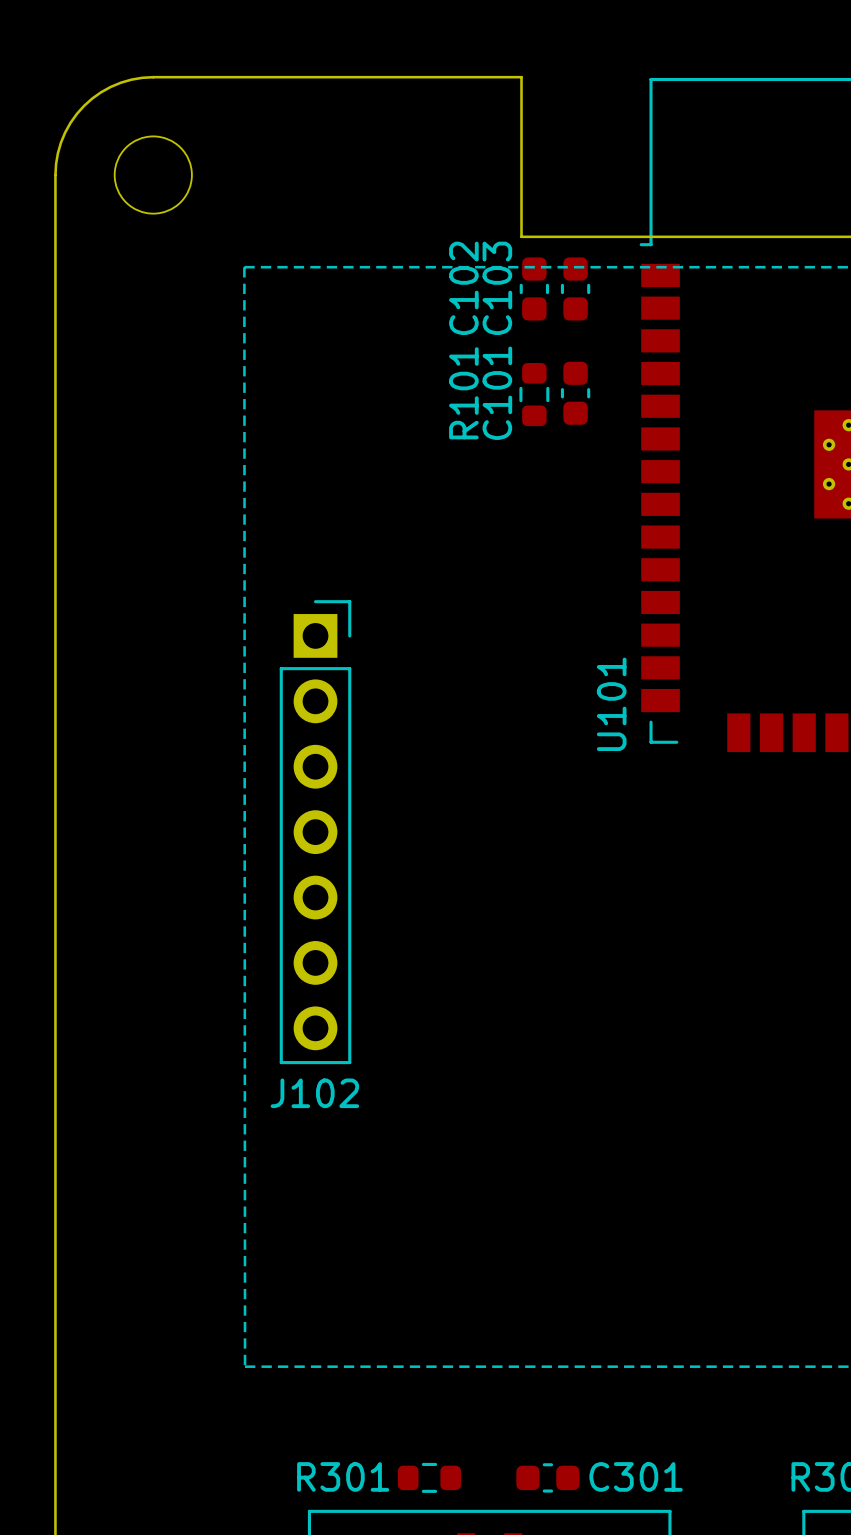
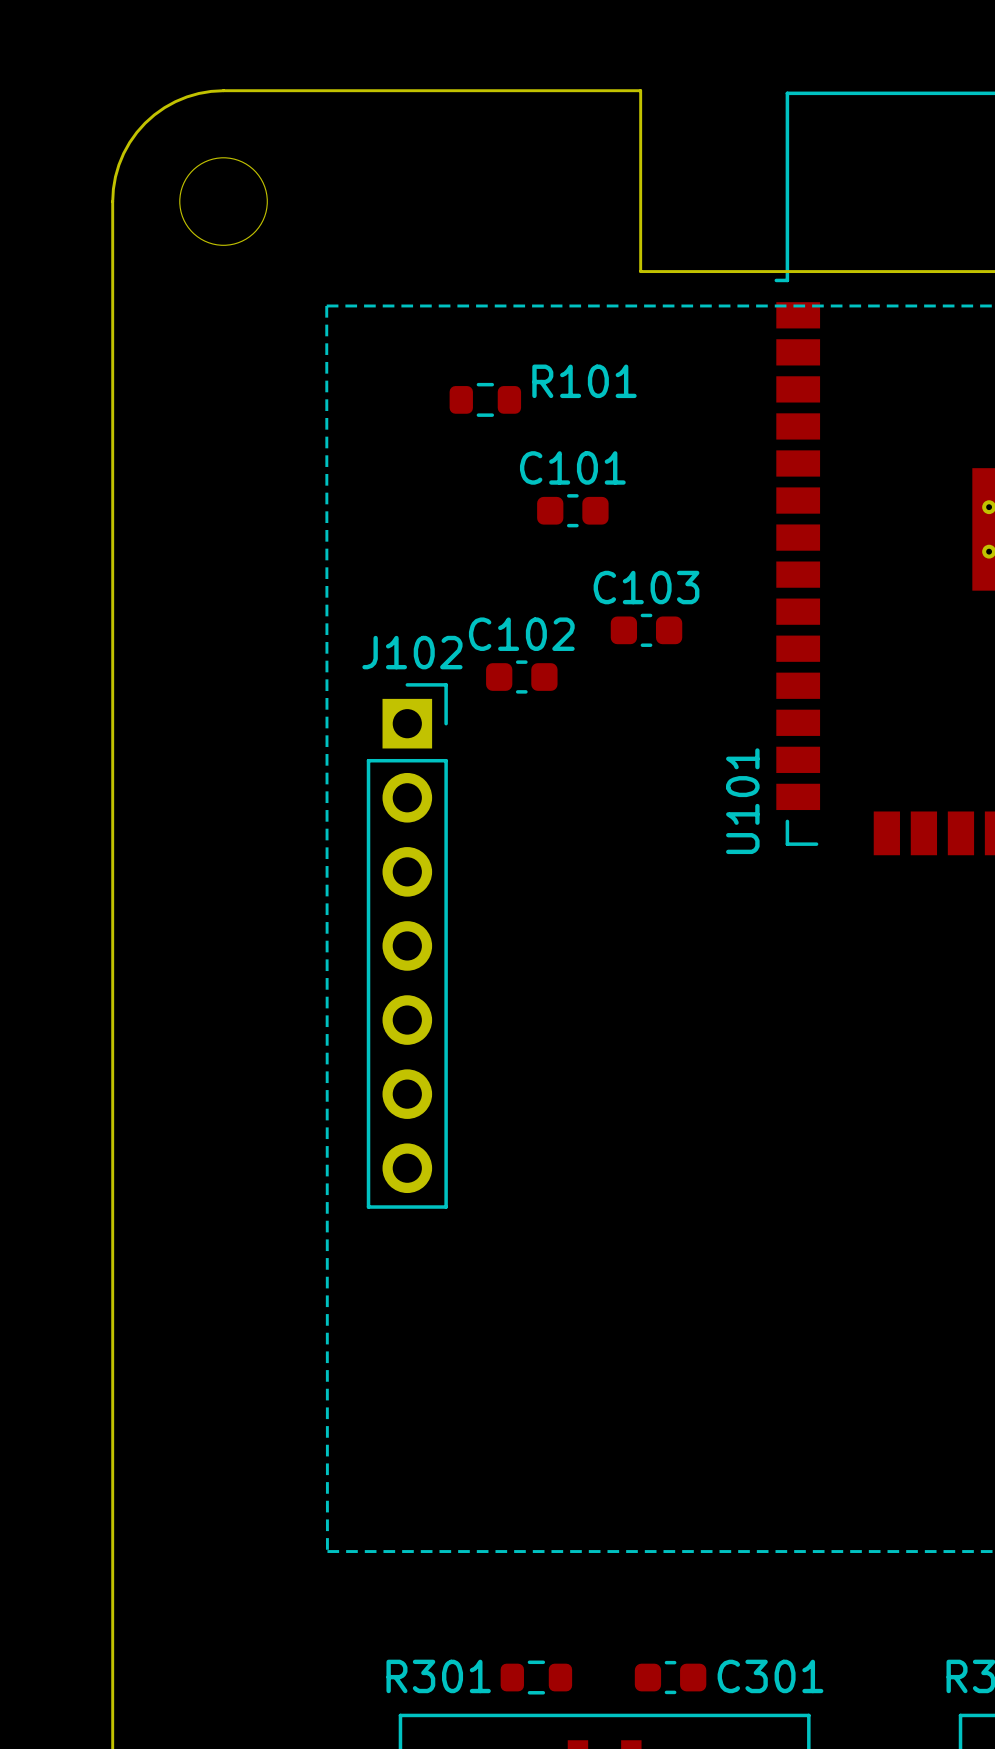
C102 rotation: 0° (534, 288) -> 90° clockwise (521, 677)
C102 position: (534, 288) -> (521, 677)
C103 rotation: 0° (575, 288) -> 90° clockwise (646, 630)
C103 position: (575, 288) -> (646, 630)
R101 name position: R101 (463, 393) -> R101 (584, 381)
C101 rotation: 0° (575, 393) -> 90° clockwise (572, 510)
C101 position: (575, 393) -> (572, 510)
R101 rotation: 0° (534, 394) -> 90° clockwise (485, 399)
R101 position: (534, 394) -> (485, 399)
J102 name position: J102 (314, 1093) -> J102 (412, 652)

